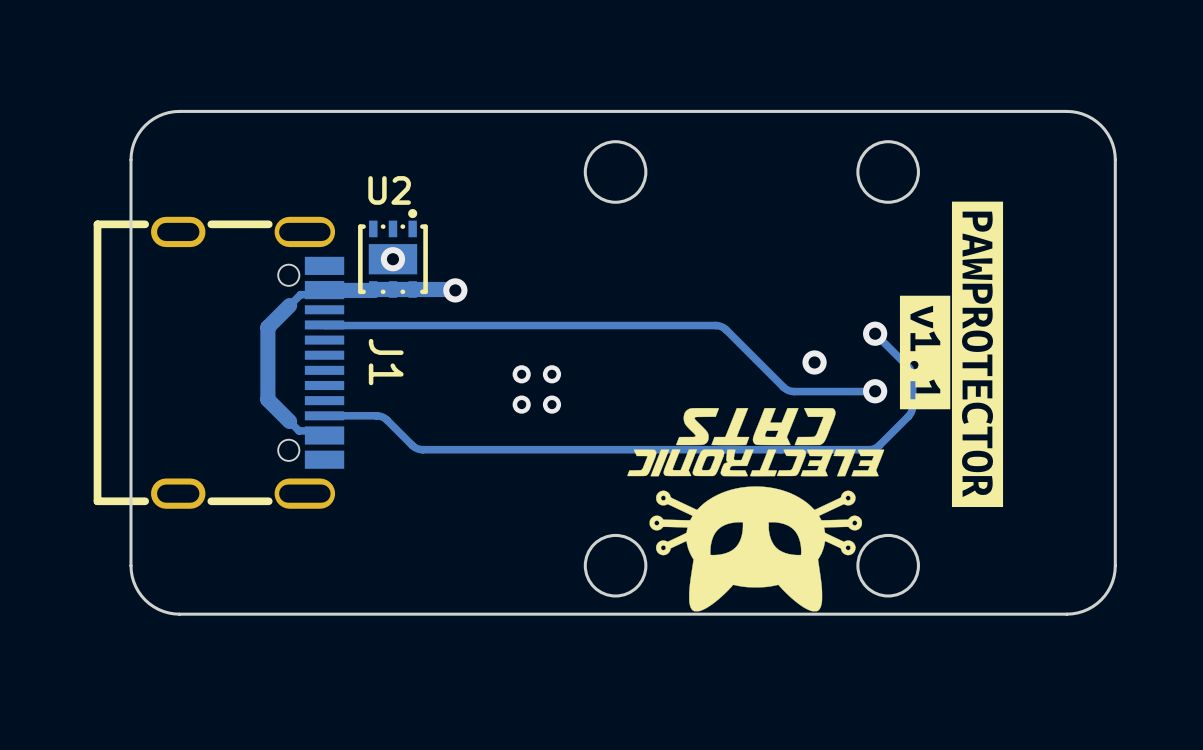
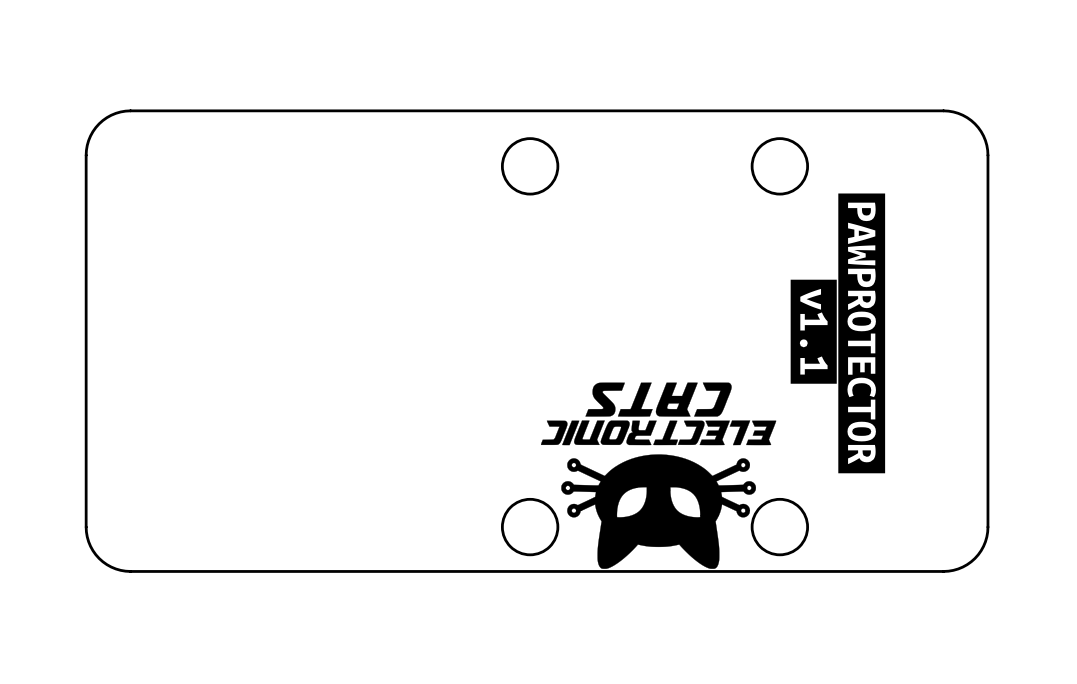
U2: (392, 253) -> none
via: (392, 259) -> none
track: (455, 290) (325, 290) -> none
via: (455, 290) -> none
track: (324, 294) (300, 294) (267, 327) (267, 399) (299, 430) (319, 430) (324, 436) -> none
track: (324, 324) (717, 325) (726, 329) (788, 390) (863, 391) -> none
track: (875, 333) (910, 370) (912, 405) (908, 416) (878, 446) (871, 449) (422, 449) (413, 446) (380, 416) (324, 415) -> none
via: (875, 333) -> none
J1: (218, 362) -> none
via: (814, 362) -> none
via: (521, 374) -> none
via: (551, 374) -> none
via: (875, 391) -> none
via: (521, 404) -> none
via: (551, 404) -> none

